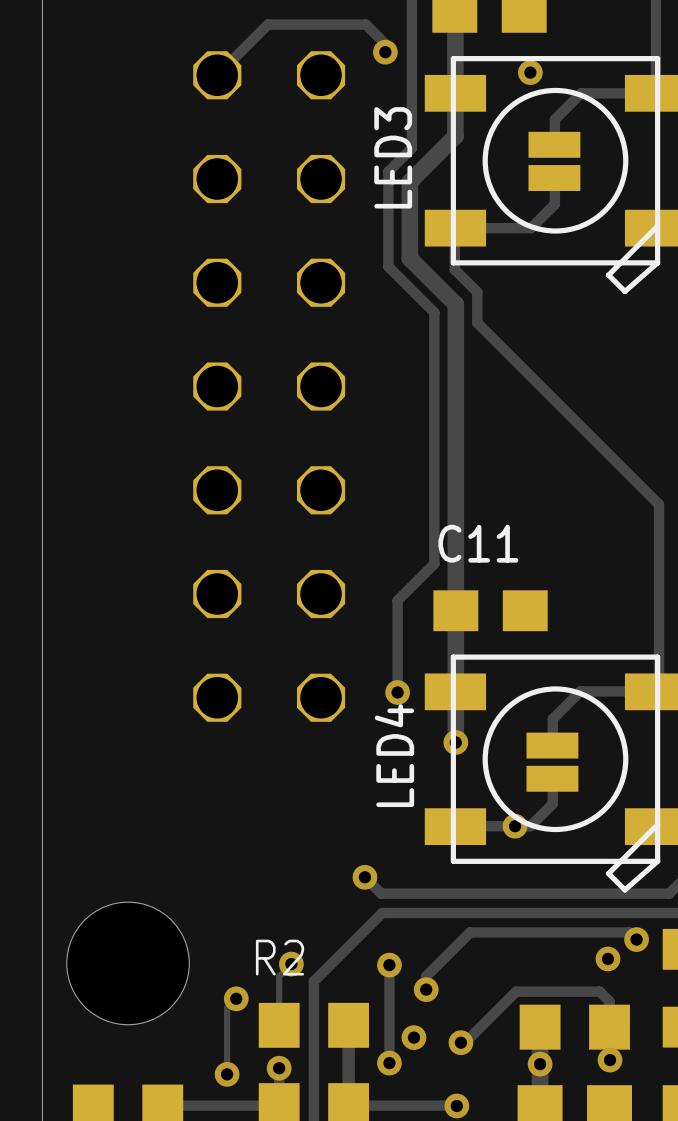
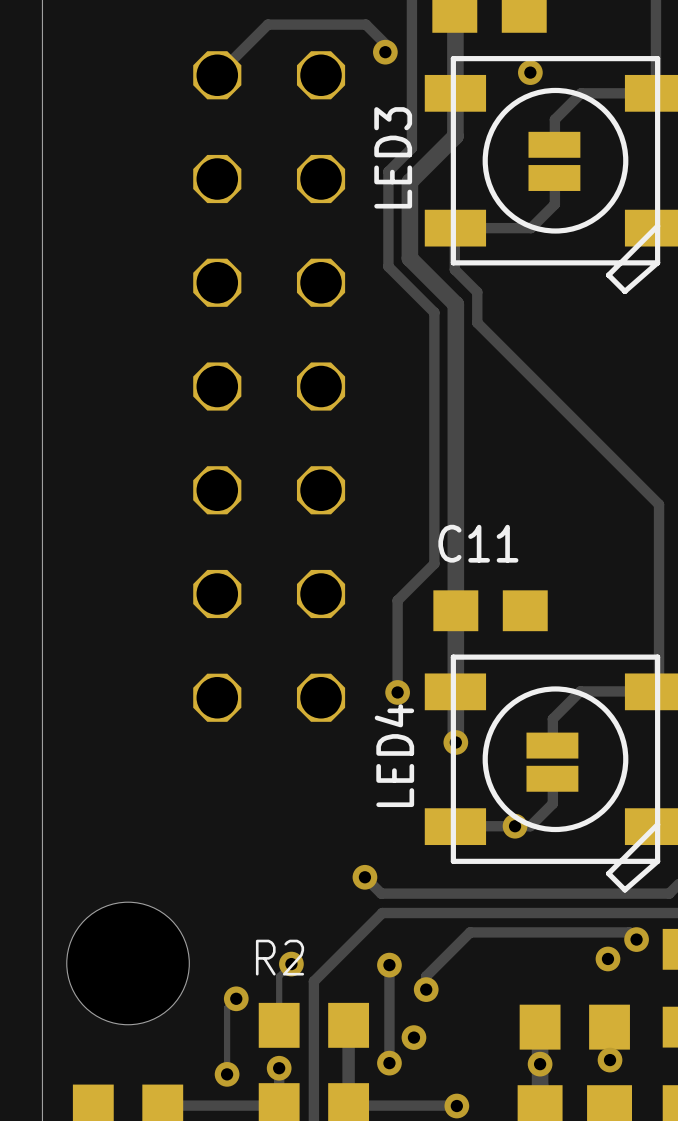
track: (609, 1027) (609, 1001) (599, 991) (516, 991) (465, 1042) (460, 1042) -> none
via: (460, 1042) -> none

